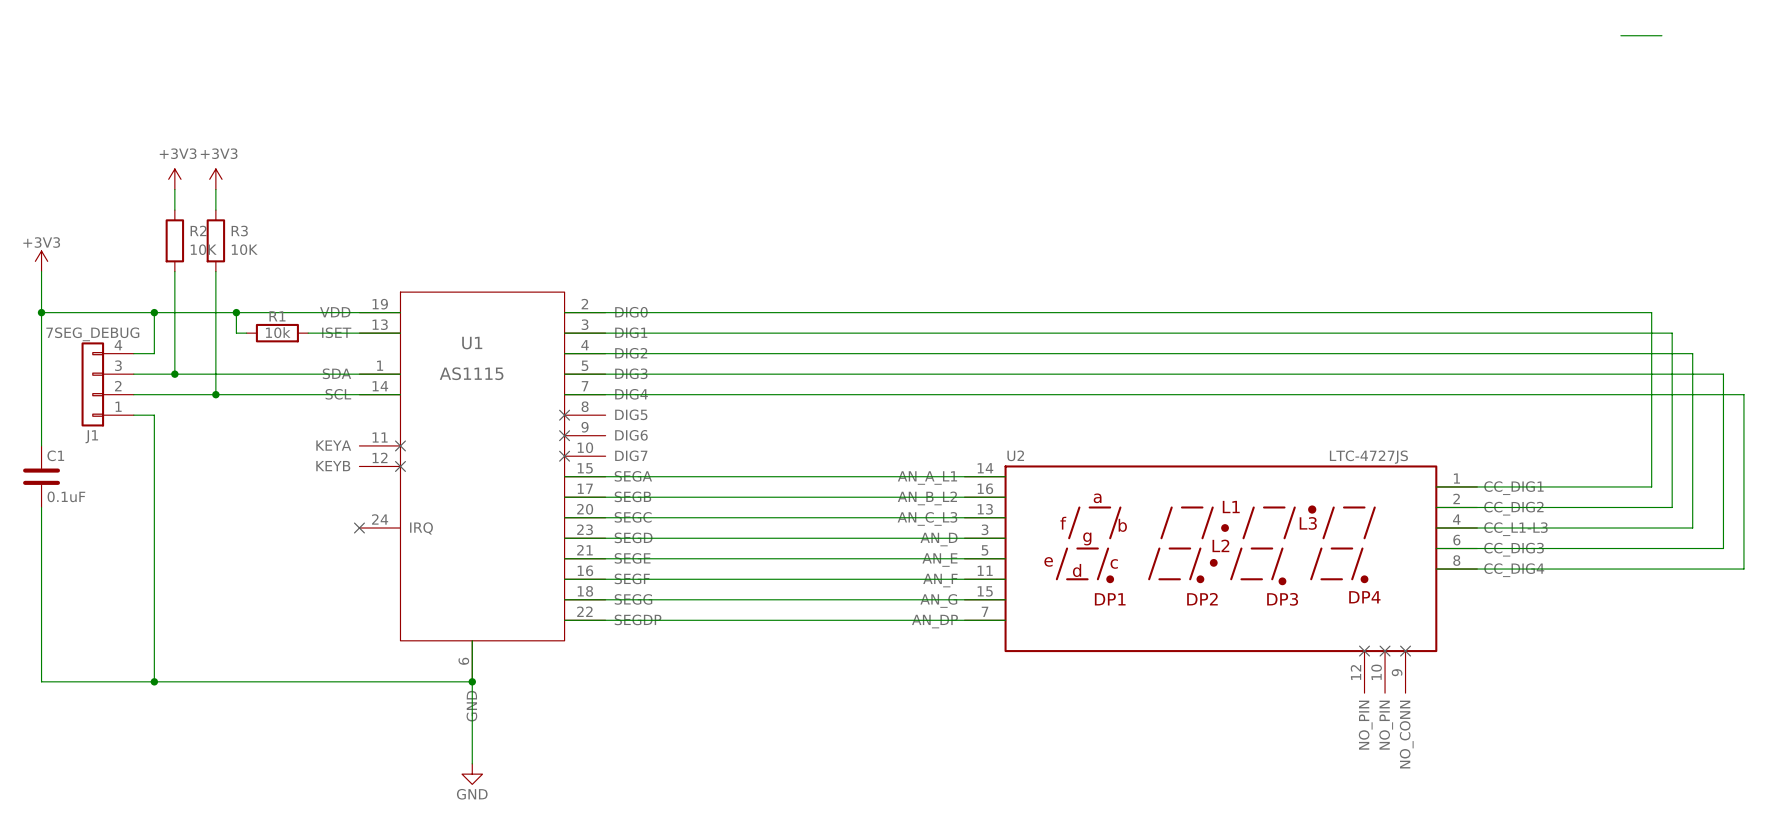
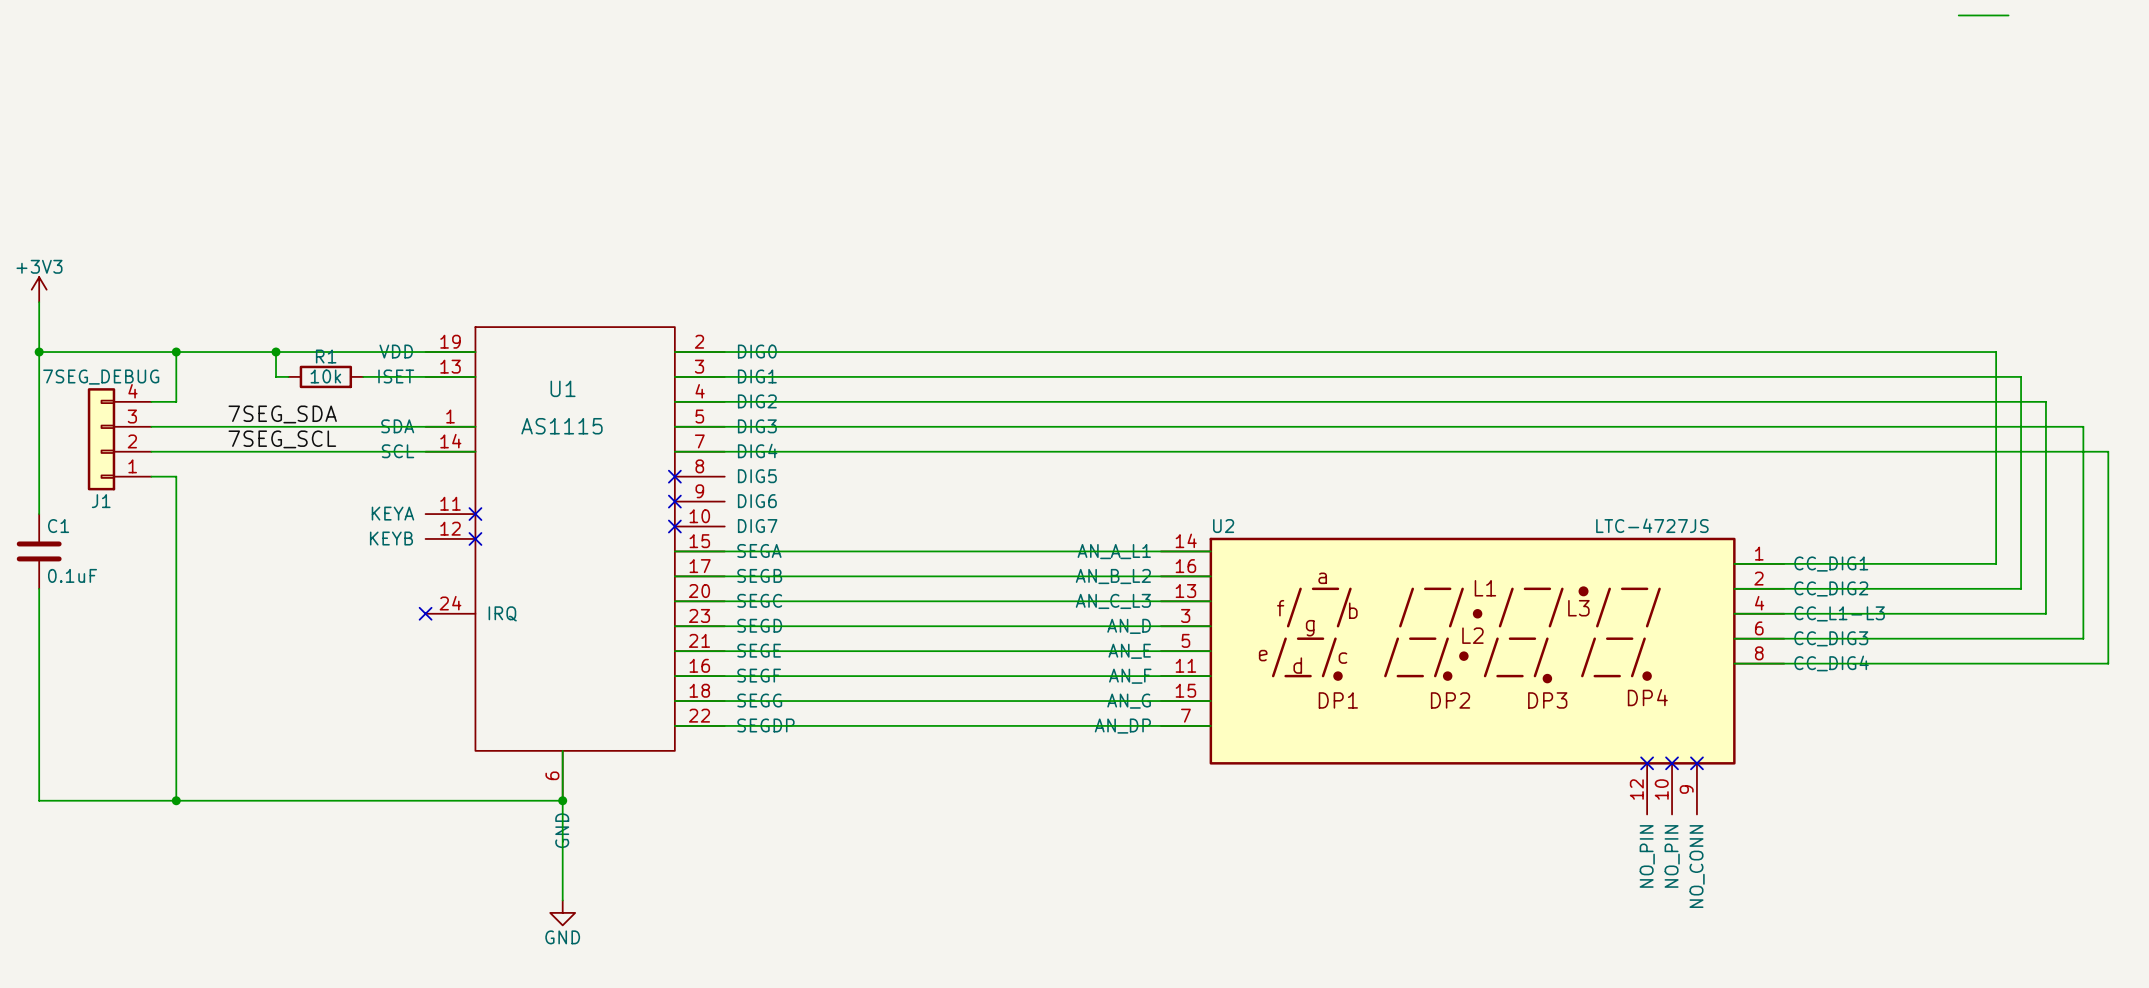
power symbol: +3V3 (174, 179) -> none
power symbol: +3V3 (215, 179) -> none
wire: (174, 189) (174, 210) -> none
wire: (215, 189) (215, 210) -> none
R2: 10K (174, 240) -> none
R3: 10K (215, 240) -> none
wire: (174, 271) (174, 374) -> none
wire: (215, 271) (215, 394) -> none
label: none -> 7SEG_SDA (282, 414)
junction: (174, 374) -> none
label: none -> 7SEG_SCL (282, 439)
junction: (215, 394) -> none

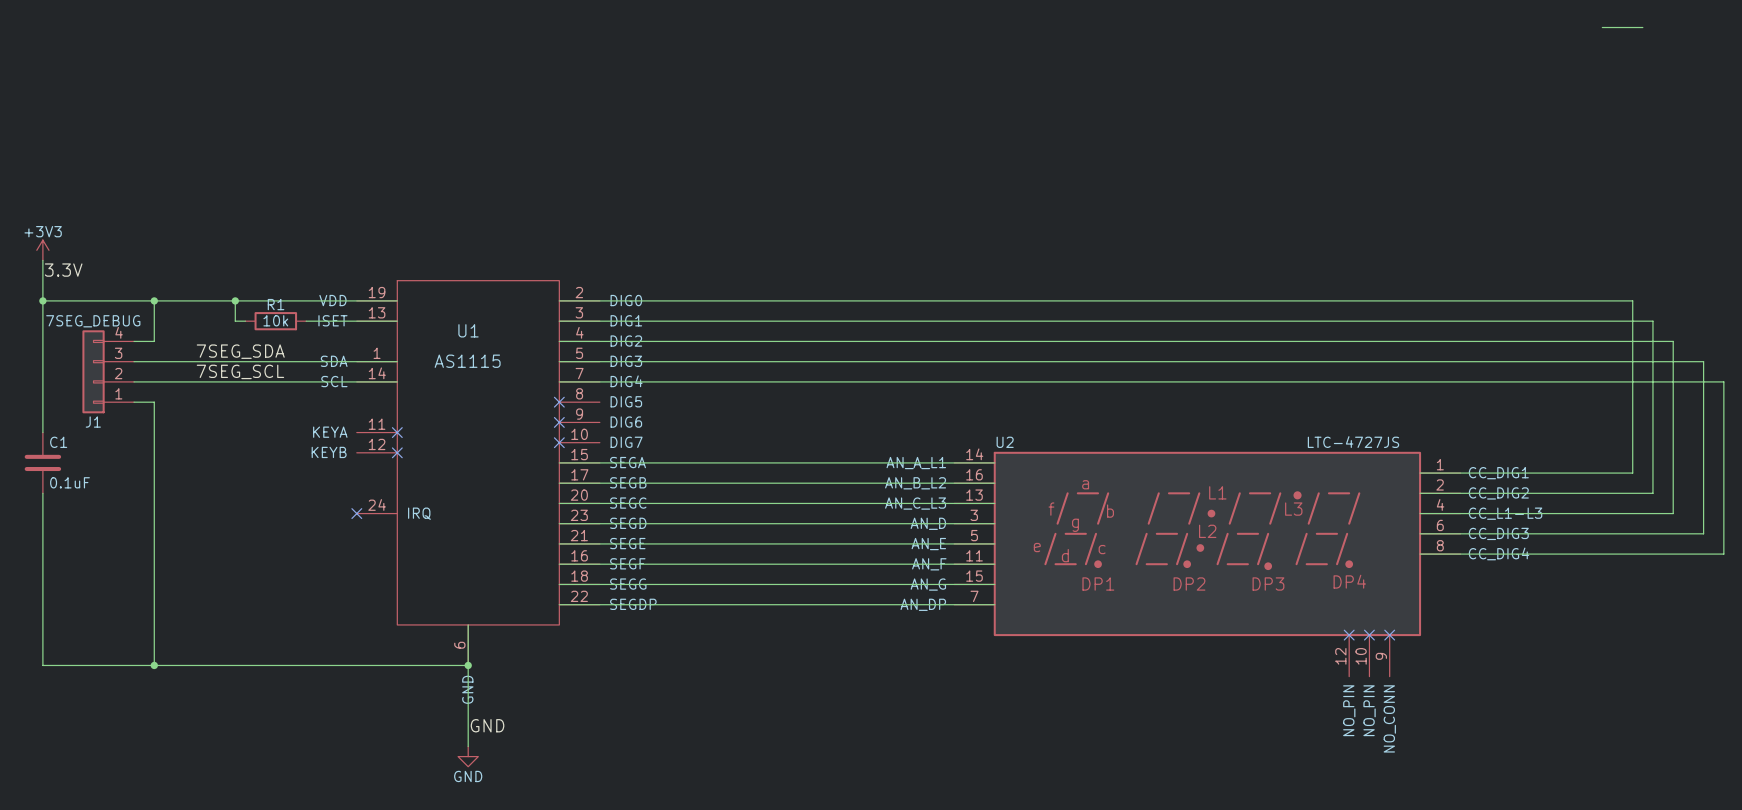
label: none -> 3.3V (63, 270)
label: none -> GND (487, 725)

